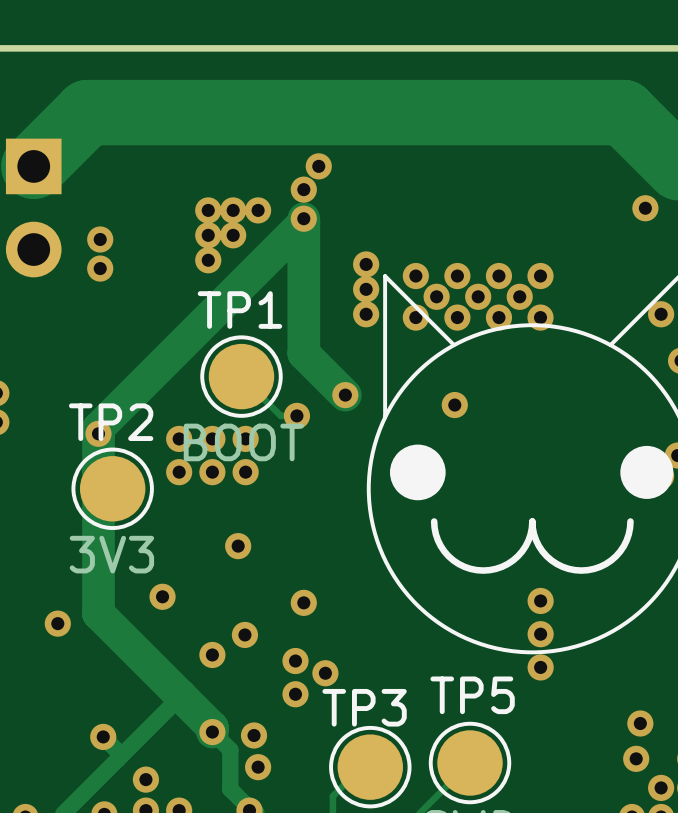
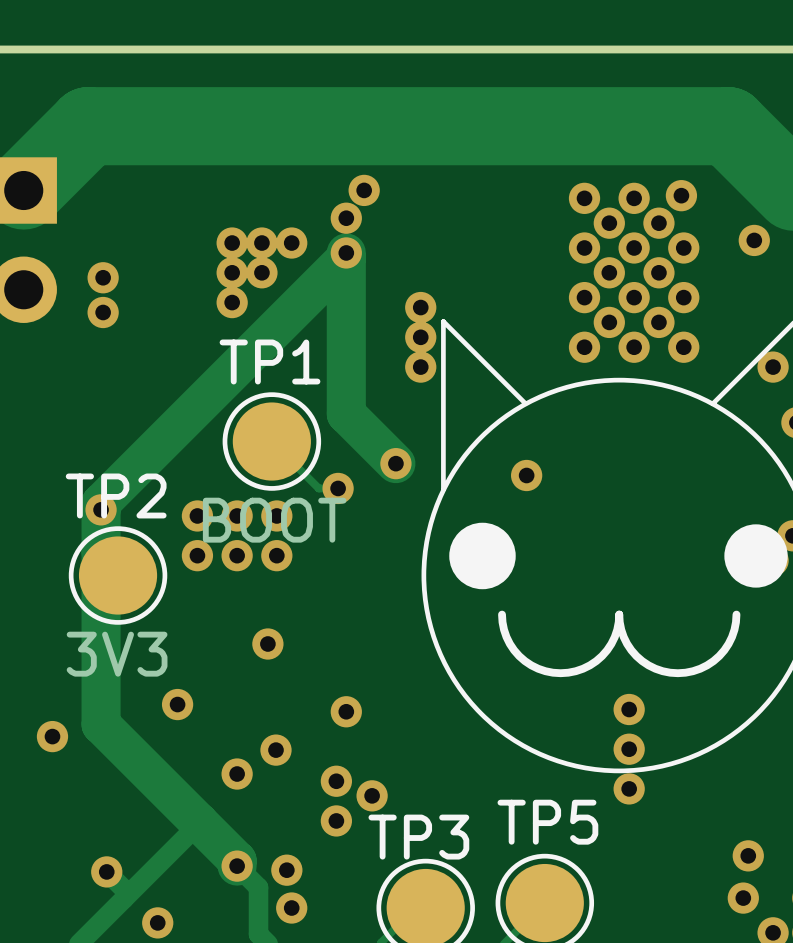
via: none -> (681, 195)
via: none -> (584, 198)
via: none -> (634, 198)
via: none -> (609, 223)
via: none -> (658, 223)
via: none -> (584, 247)
via: none -> (634, 247)
via: none -> (683, 247)
via: none -> (609, 272)
via: none -> (658, 272)
via: none -> (584, 297)
via: none -> (634, 297)
via: none -> (683, 297)
via: (415, 276) -> none
via: (457, 276) -> none
via: (498, 276) -> none
via: none -> (609, 322)
via: (540, 276) -> none
via: none -> (658, 322)
via: (436, 296) -> none
via: (478, 296) -> none
via: (519, 296) -> none
via: none -> (584, 347)
via: none -> (634, 347)
via: none -> (683, 347)
via: (415, 317) -> none
via: (457, 317) -> none
via: (498, 317) -> none
via: (540, 317) -> none

